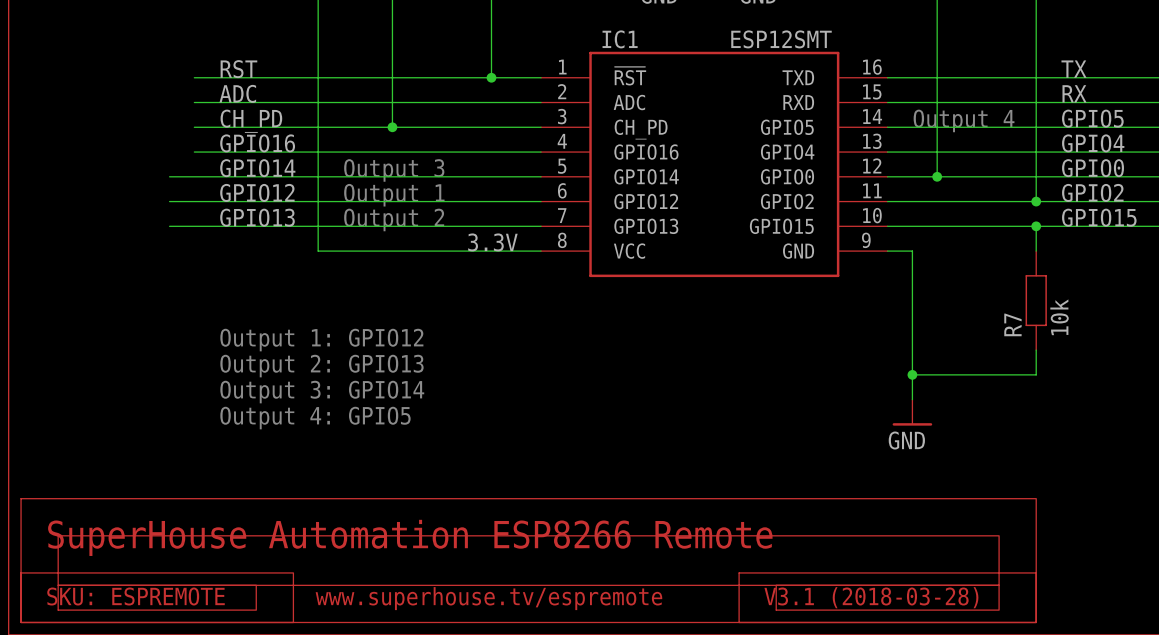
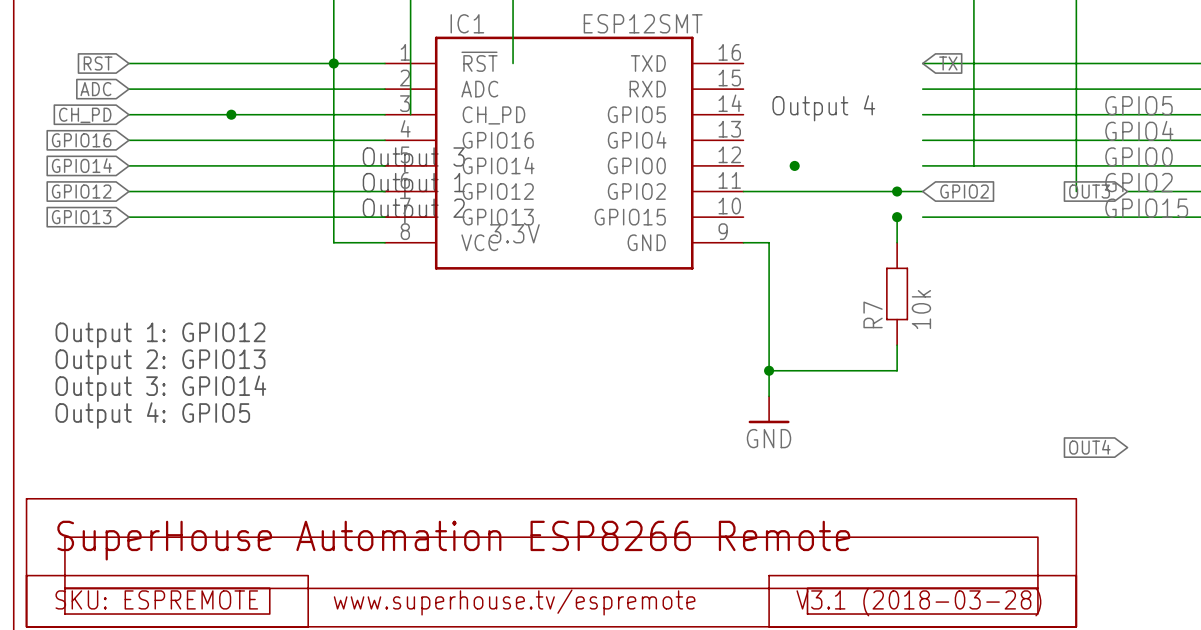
label: RST (238, 69) -> none
label: TX (1074, 69) -> none
global label: none -> RST (98, 63)
wire: none -> (128, 63) (205, 63)
junction: none -> (333, 63)
wire: (367, 77) (541, 77) -> none
junction: (491, 77) -> none
global label: none -> TX (948, 63)
label: ADC (237, 93) -> none
label: RX (1074, 93) -> none
global label: none -> ADC (95, 89)
wire: none -> (128, 89) (205, 89)
wire: (367, 102) (541, 102) -> none
text position: Output 4 (964, 120) -> Output 4 (823, 108)
label: CH_PD (251, 121) -> none
wire: none -> (128, 114) (205, 114)
junction: none -> (231, 114)
wire: (367, 127) (541, 127) -> none
junction: (392, 127) -> none
global label: none -> CH_PD (85, 115)
label: GPIO16 (257, 143) -> none
global label: none -> GPIO16 (81, 140)
wire: none -> (128, 140) (205, 140)
wire: (367, 152) (541, 152) -> none
IC1 position: (714, 164) -> (564, 153)
label: GPIO14 (257, 168) -> none
global label: none -> GPIO14 (81, 165)
wire: none -> (128, 165) (180, 165)
wire: (367, 176) (541, 176) -> none
junction: none -> (794, 165)
junction: (937, 176) -> none
label: GPIO12 (257, 192) -> none
global label: none -> GPIO12 (81, 191)
wire: none -> (128, 191) (180, 191)
wire: (367, 201) (541, 201) -> none
junction: none -> (897, 191)
wire: (887, 201) (1085, 201) -> (922, 191) (743, 191)
global label: none -> GPIO2 (964, 191)
junction: (1036, 201) -> none
global label: none -> OUT3 (1089, 191)
label: GPIO13 (257, 217) -> none
global label: none -> GPIO13 (81, 217)
wire: none -> (128, 217) (180, 217)
wire: (367, 226) (541, 226) -> none
junction: none -> (897, 217)
wire: (1036, 226) (1036, 251) -> (897, 217) (897, 242)
junction: (1036, 226) -> none
wire: (367, 251) (541, 251) -> none
wire: (887, 251) (912, 251) (912, 399) -> (743, 242) (769, 242) (769, 396)
R7 position: (1036, 300) -> (897, 293)
text position: Output 1: GPIO12 (321, 340) -> Output 1: GPIO12 (160, 335)
wire: (1036, 350) (1036, 374) (912, 374) -> (897, 345) (897, 370) (769, 370)
text position: Output 2: GPIO13 (321, 366) -> Output 2: GPIO13 (160, 362)
junction: none -> (769, 370)
junction: (912, 374) -> none
text position: Output 3: GPIO14 (322, 392) -> Output 3: GPIO14 (160, 388)
power symbol position: GND (912, 412) -> GND (769, 409)
text position: Output 4: GPIO5 (315, 418) -> Output 4: GPIO5 (152, 415)
global label: none -> OUT4 (1089, 447)

